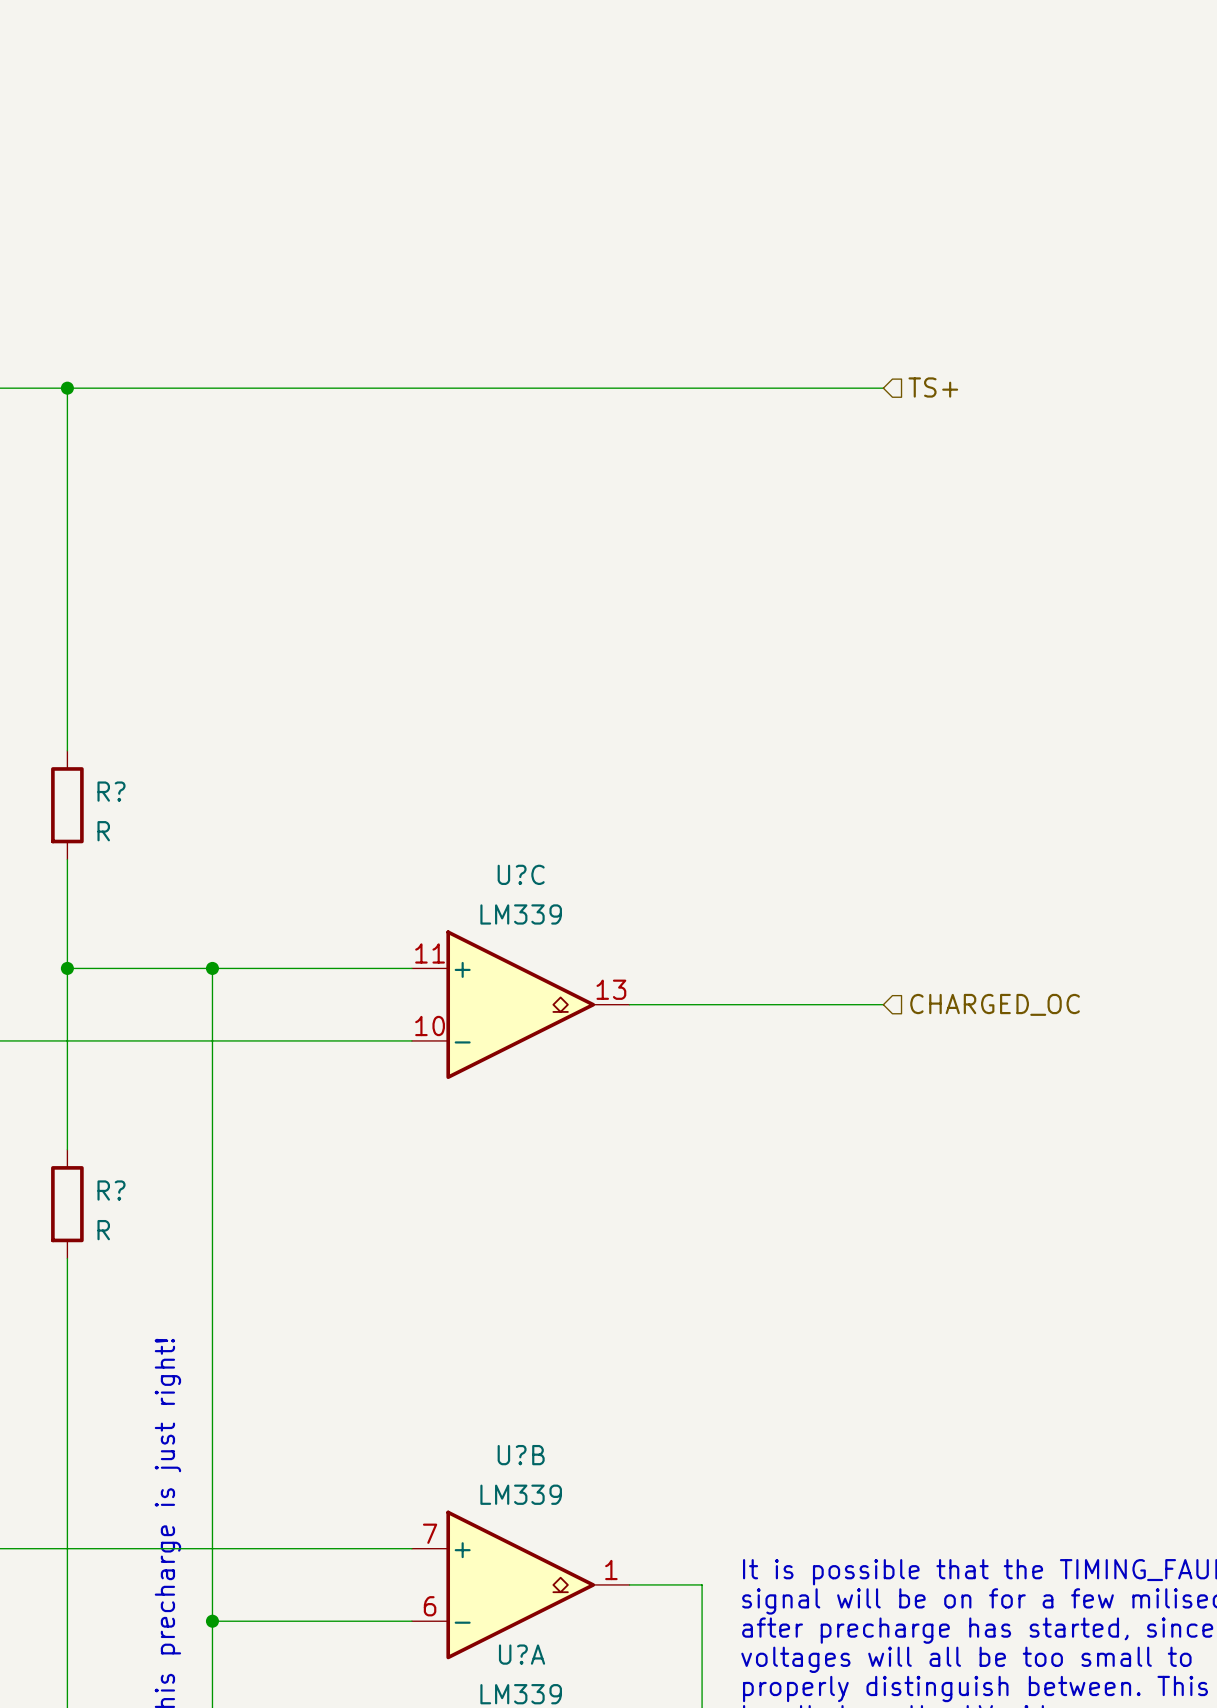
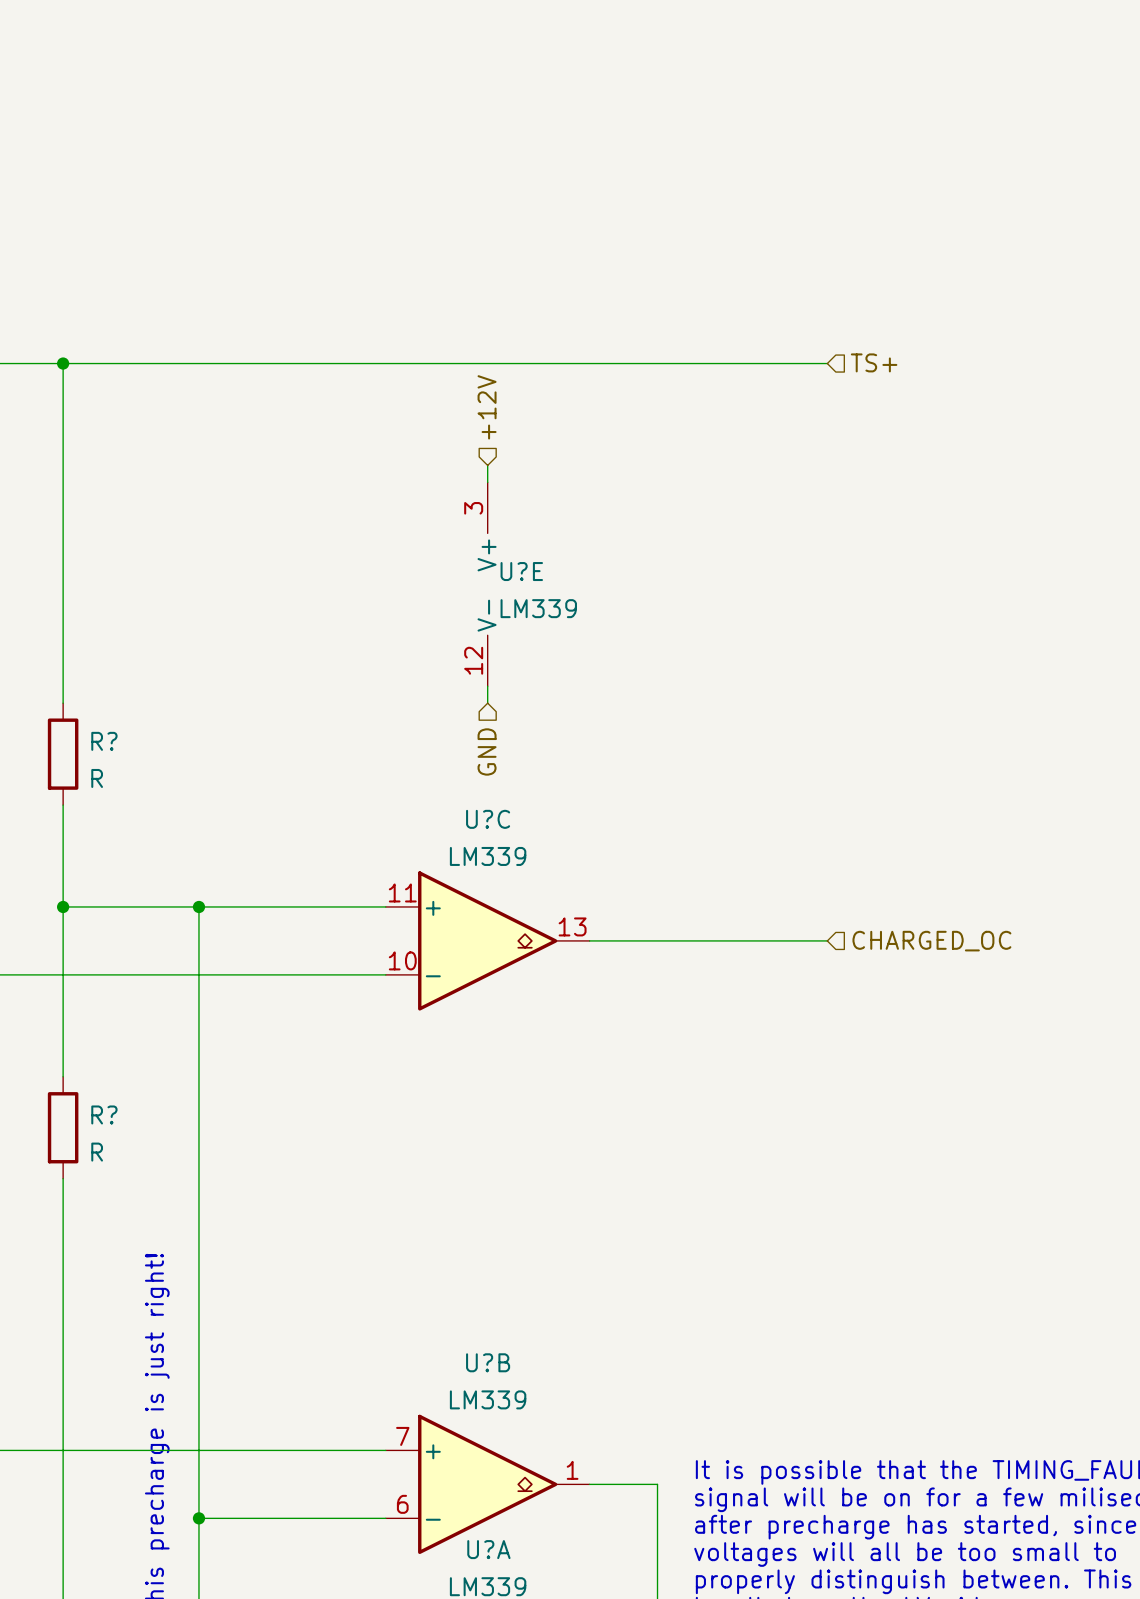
hierarchical label: none -> +12V (487, 407)
wire: none -> (487, 465) (487, 482)
U?E: none -> LM339 (487, 584)
wire: none -> (487, 686) (487, 703)
hierarchical label: none -> GND (487, 751)

